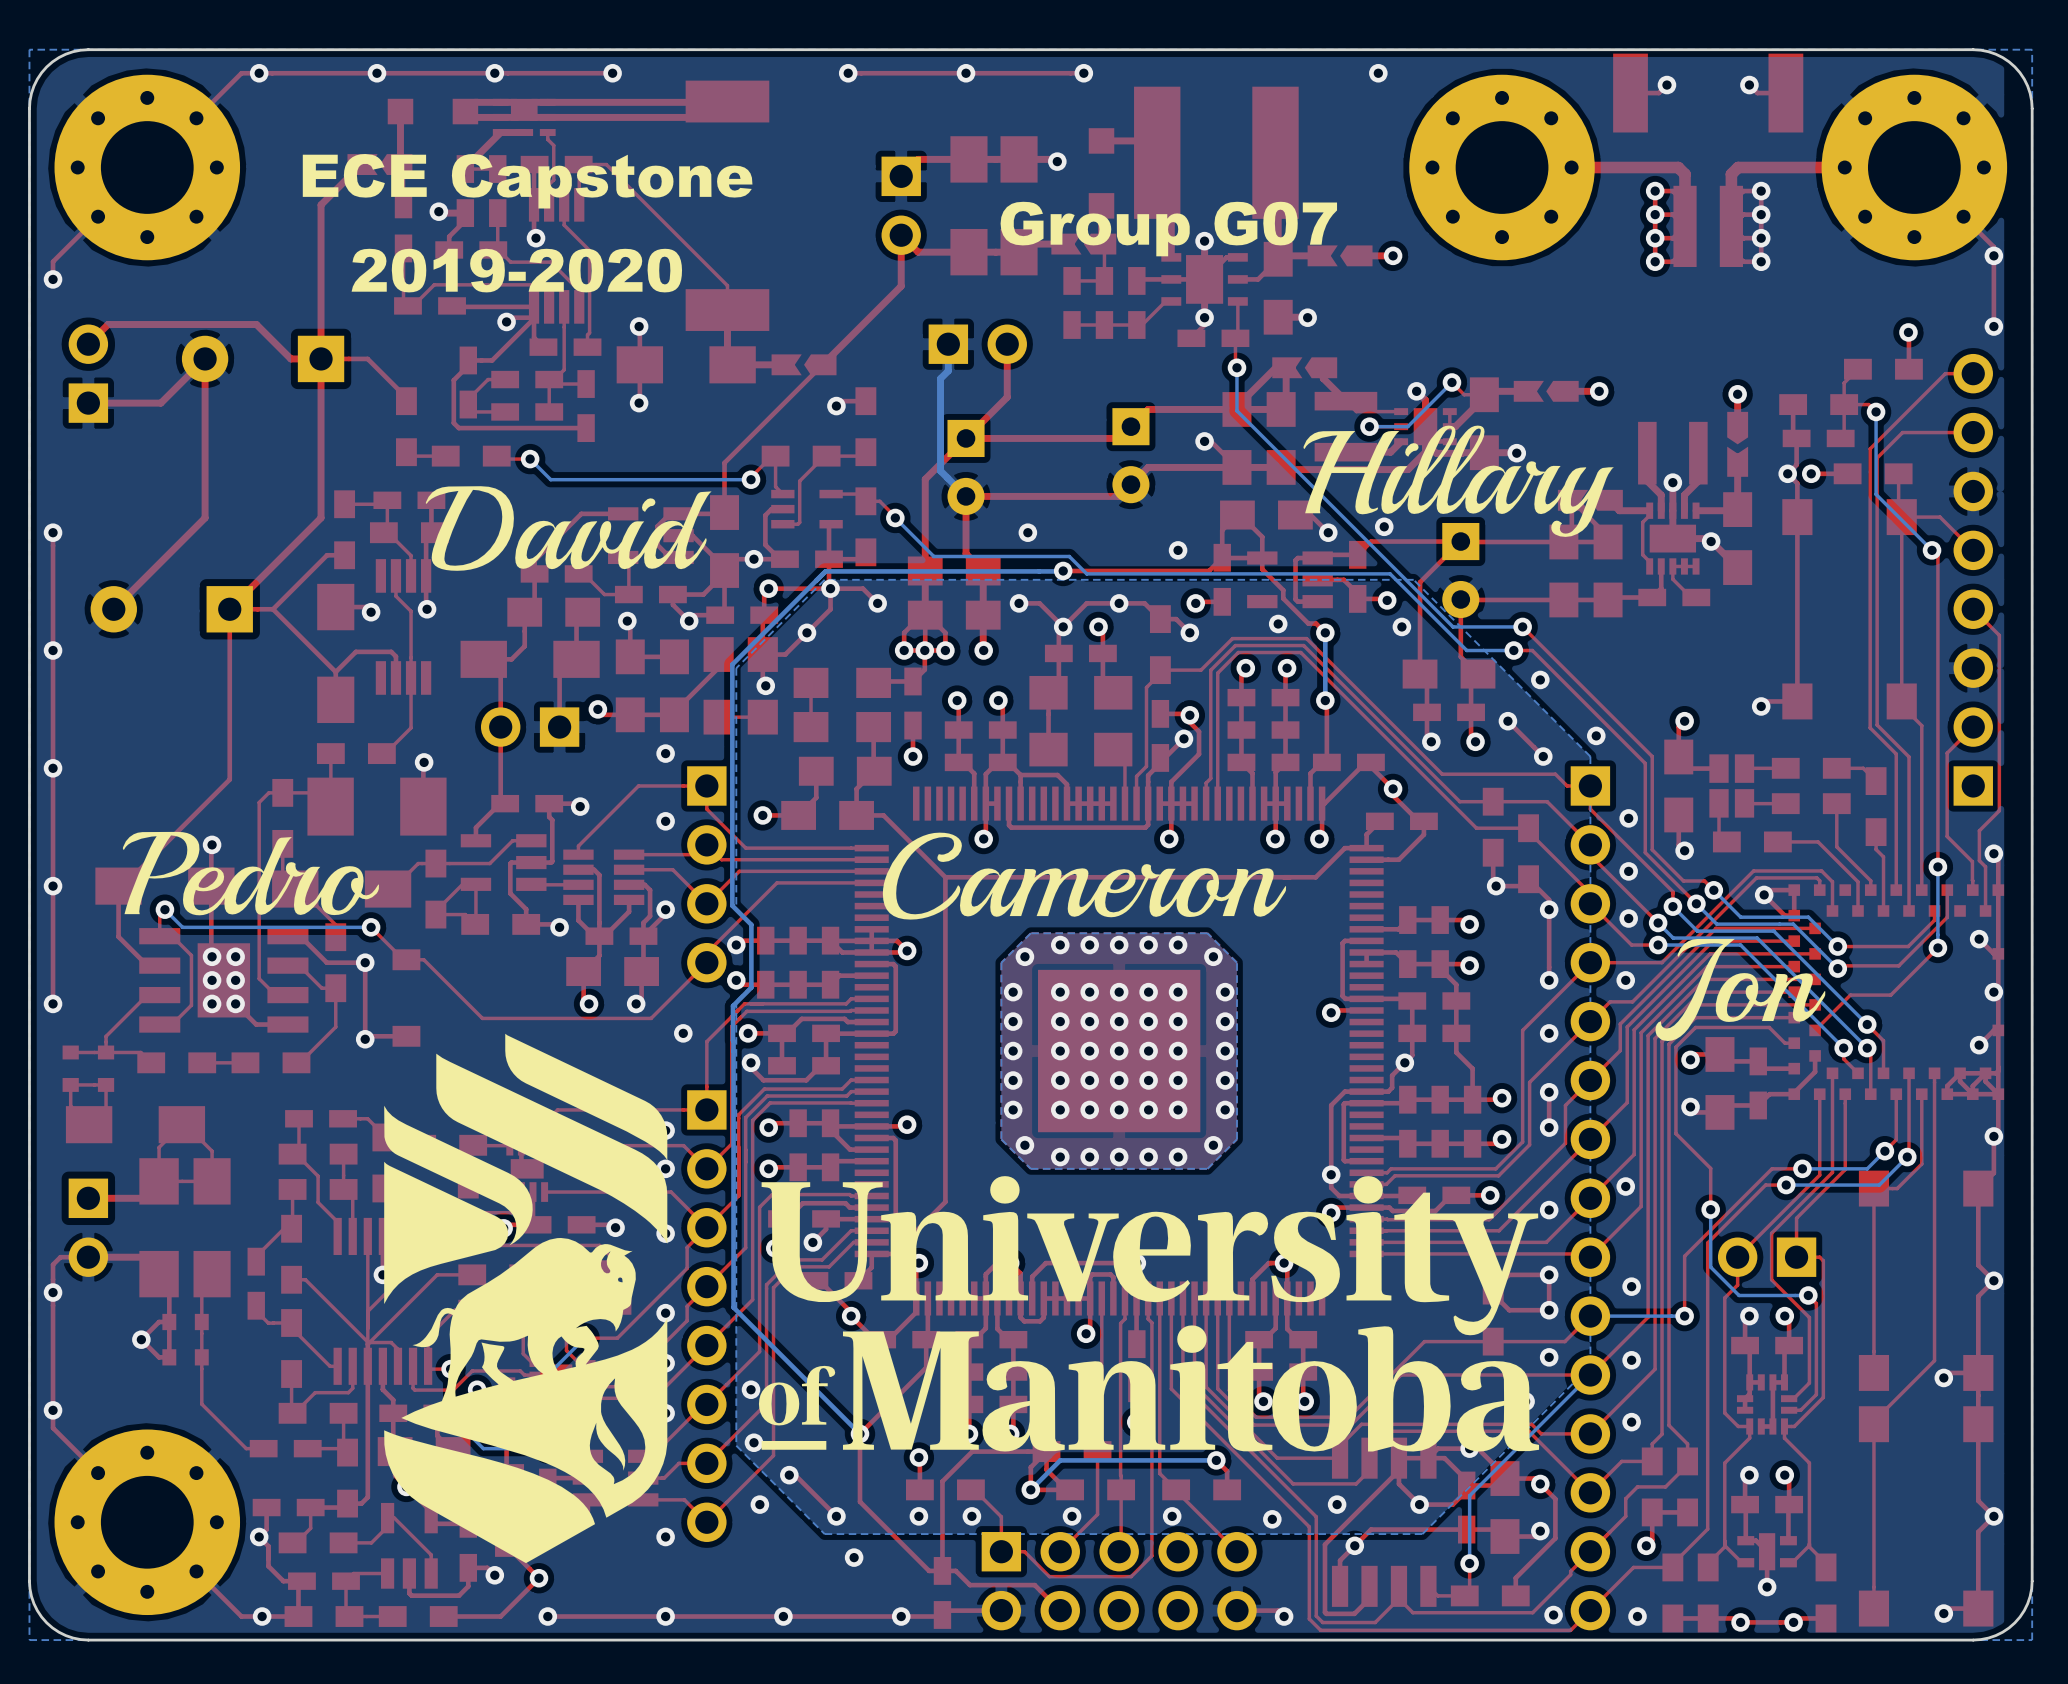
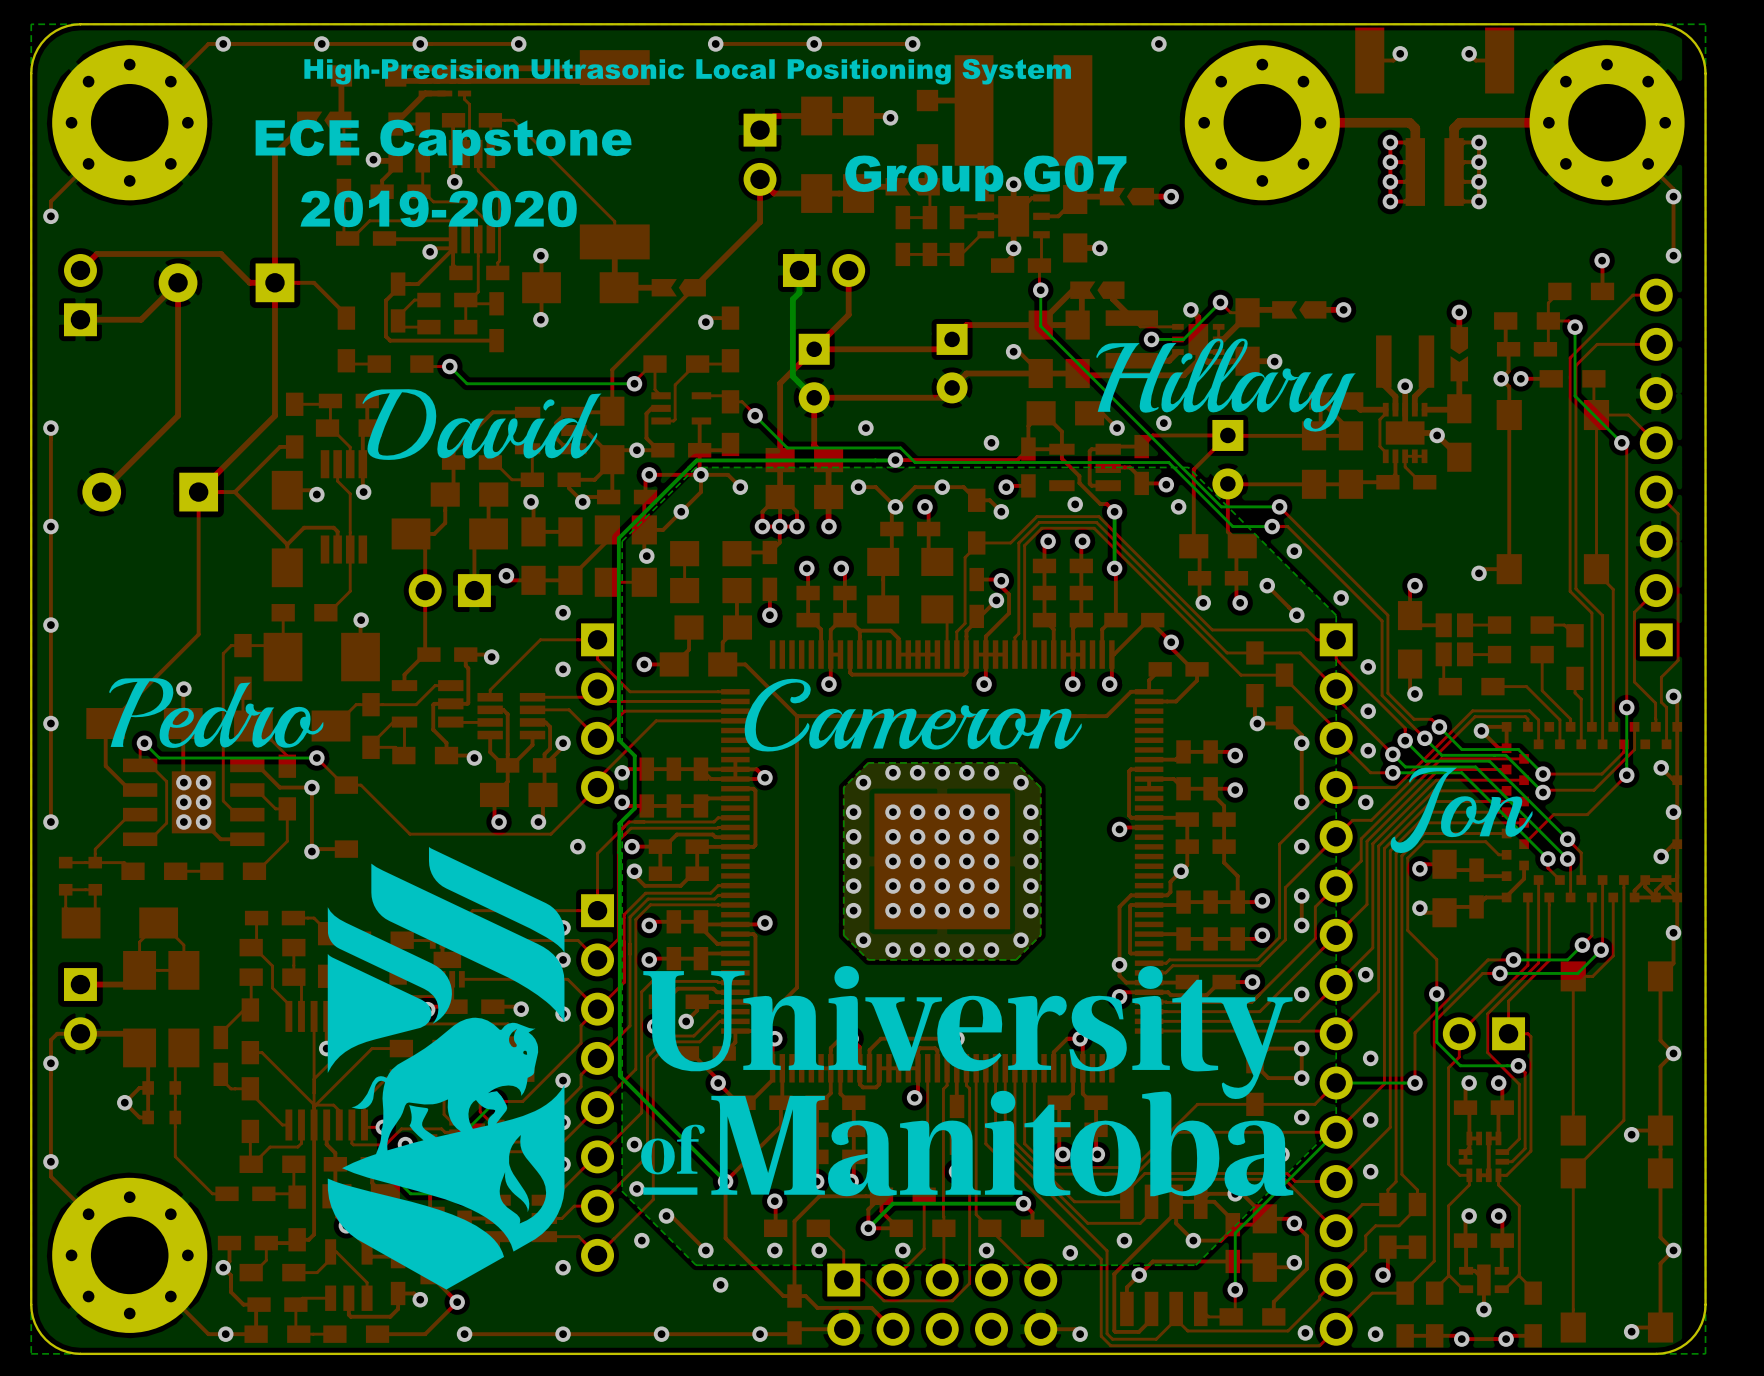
drawing: none -> [109, 58, 1533, 1290]
drawing: [122, 153, 1826, 1564] -> none

